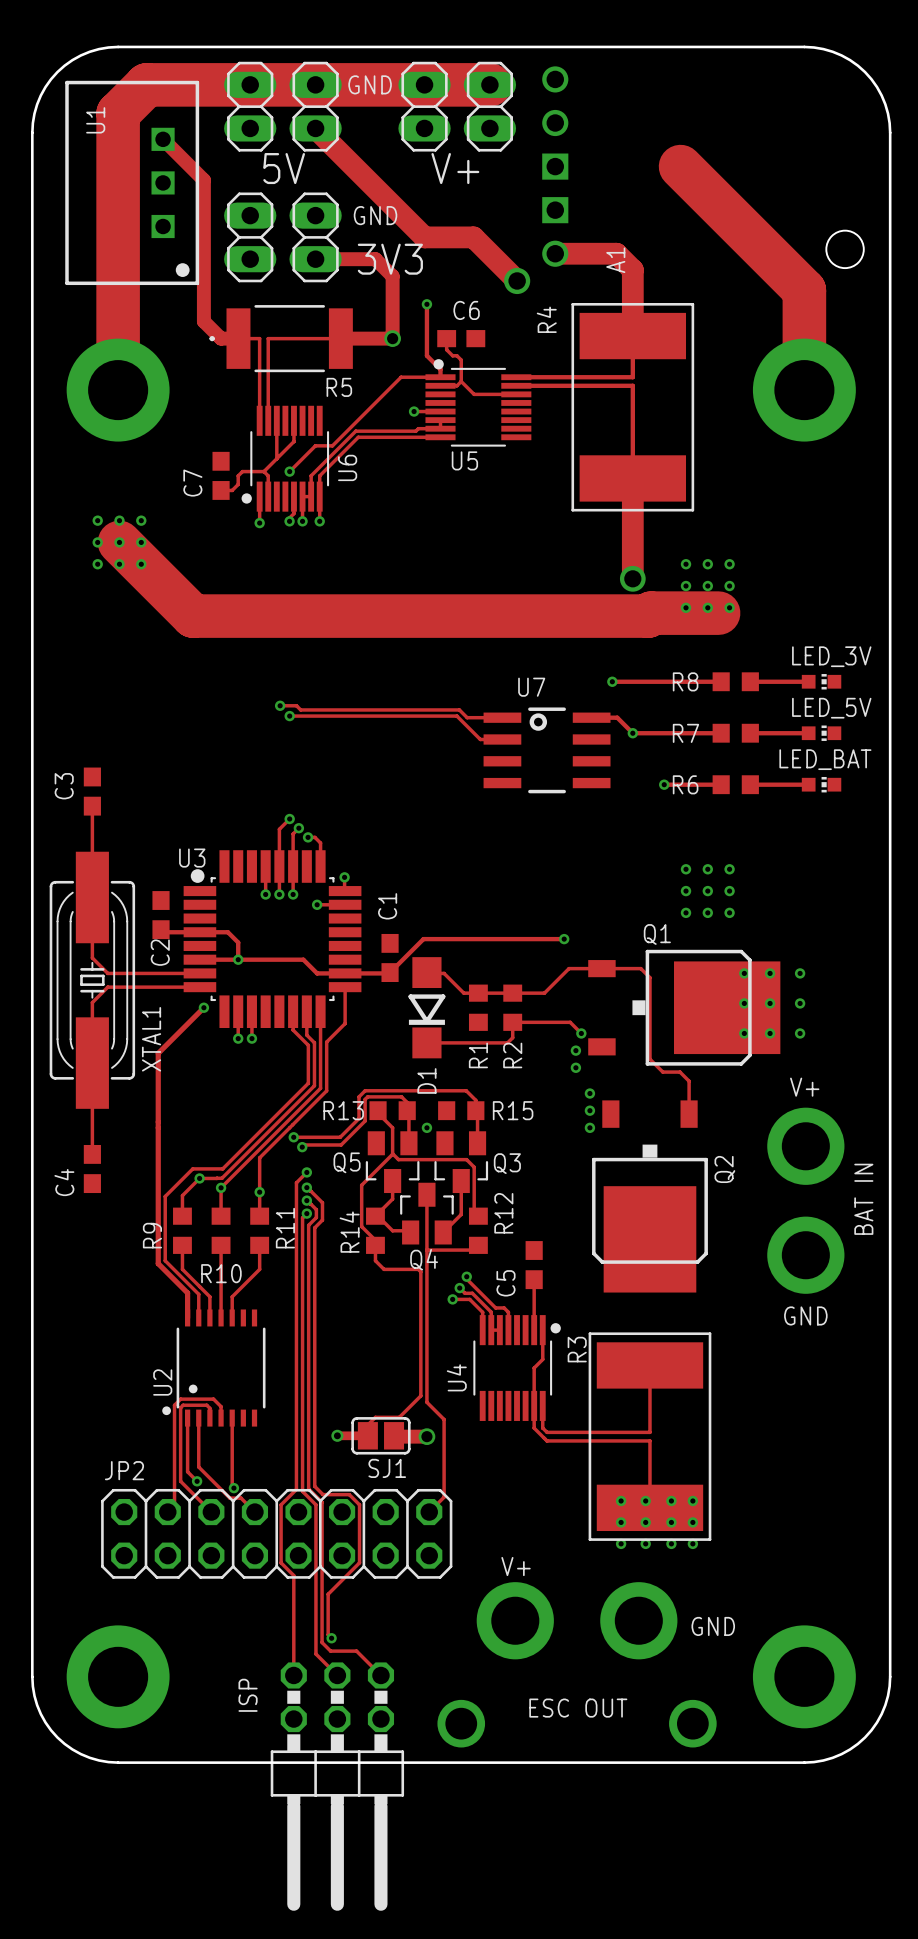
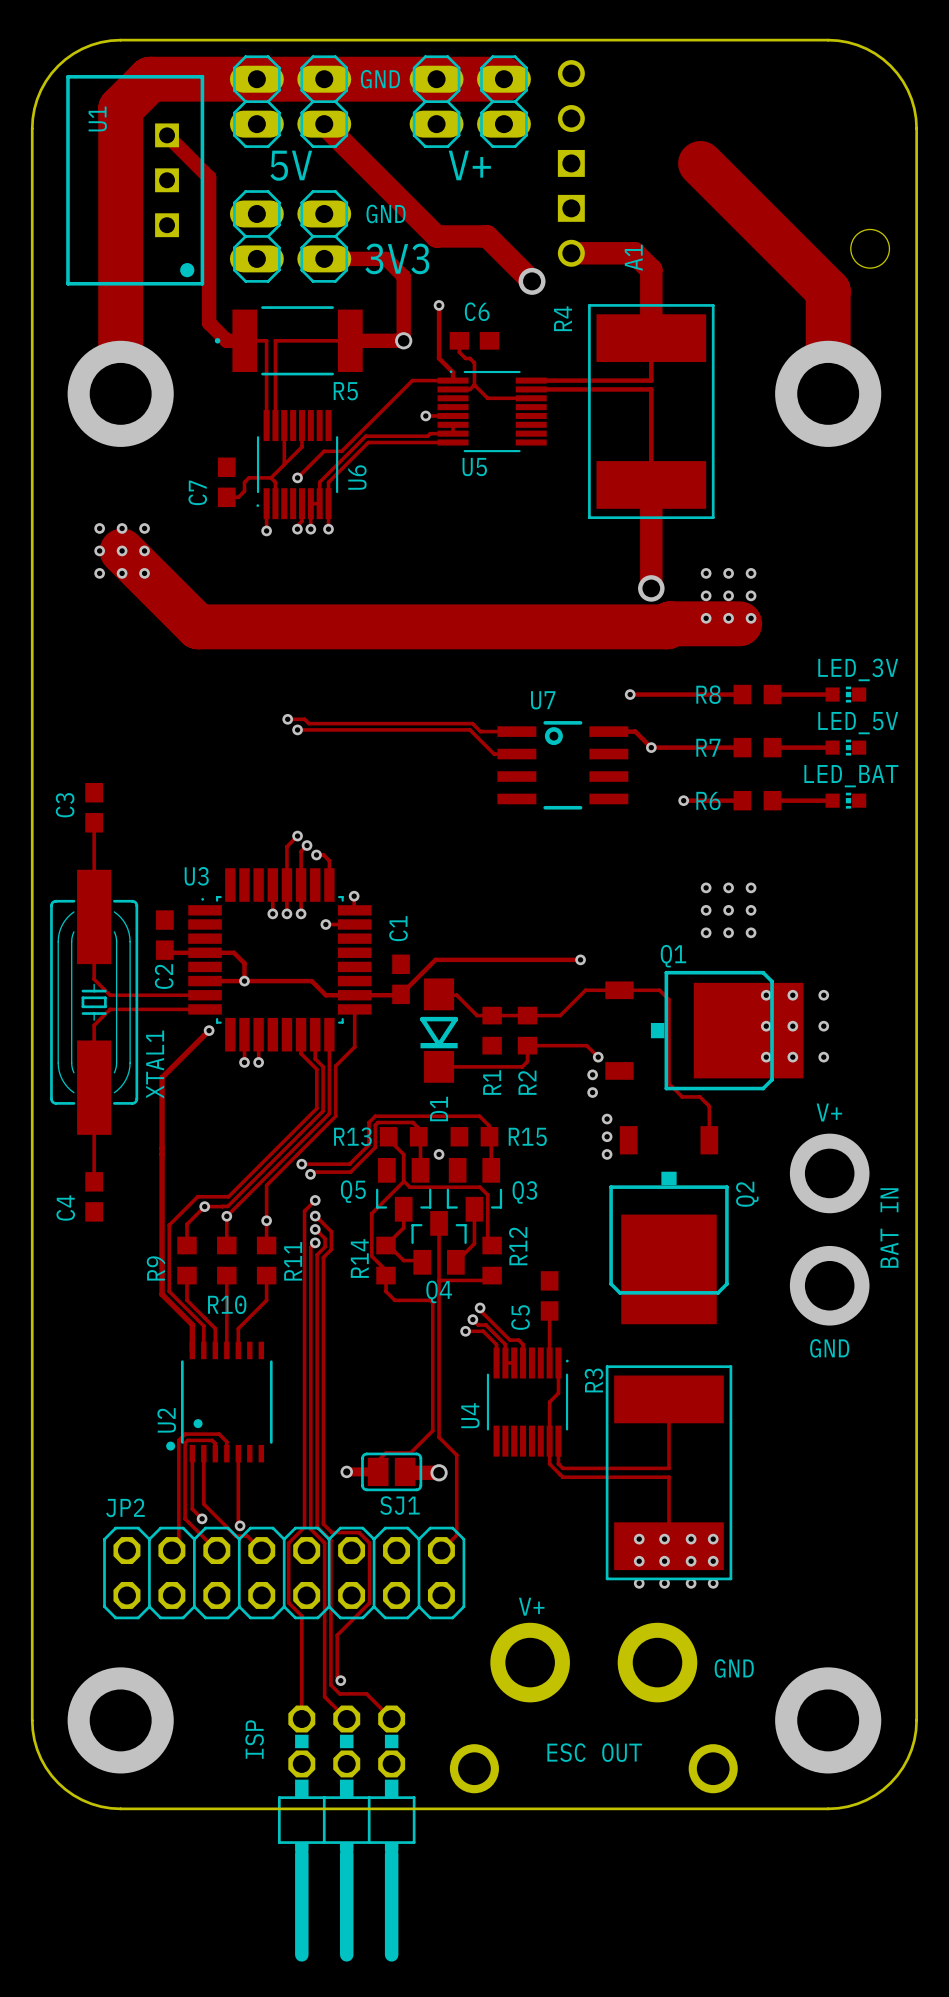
U5 footprint: [425, 359, 532, 447] -> [437, 370, 547, 453]
U6 footprint: [241, 405, 330, 512] -> [256, 410, 339, 520]
U3 footprint: [183, 850, 362, 1029] -> [188, 868, 372, 1052]
U4 footprint: [473, 1315, 561, 1421] -> [486, 1347, 569, 1457]

